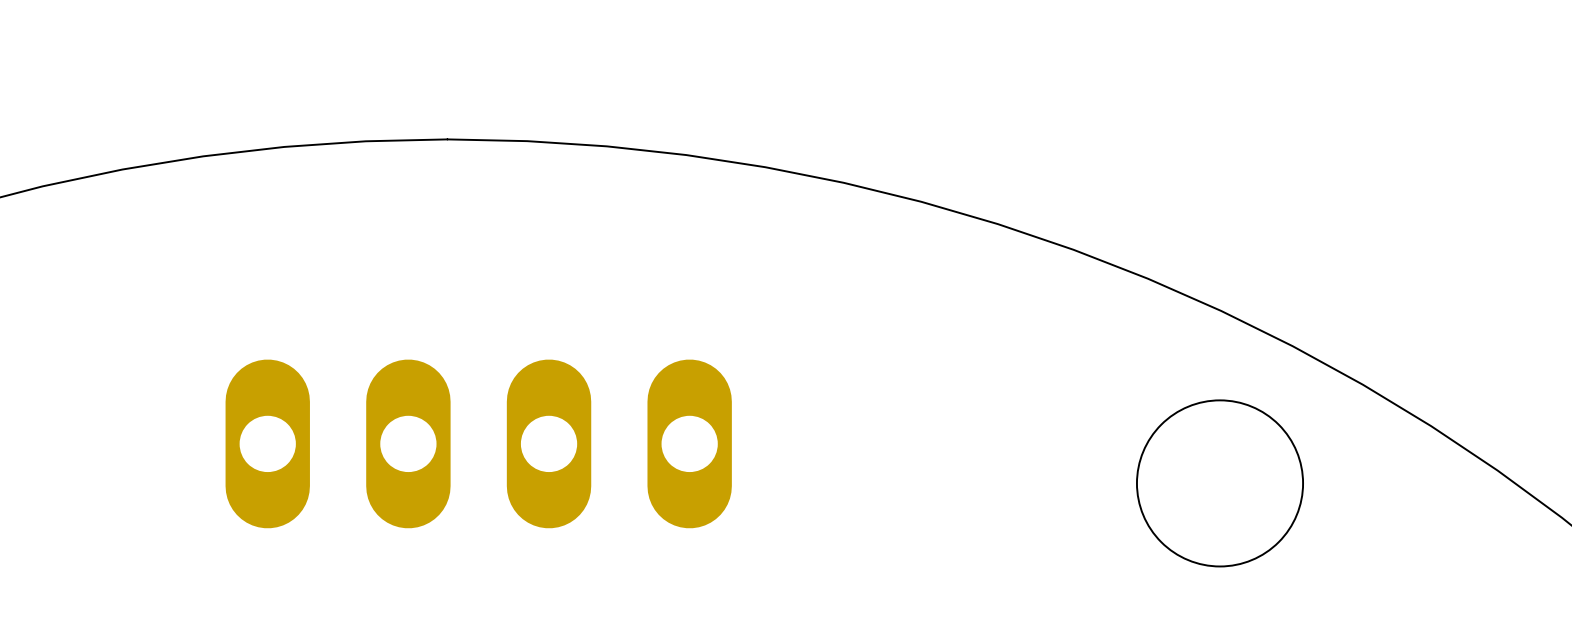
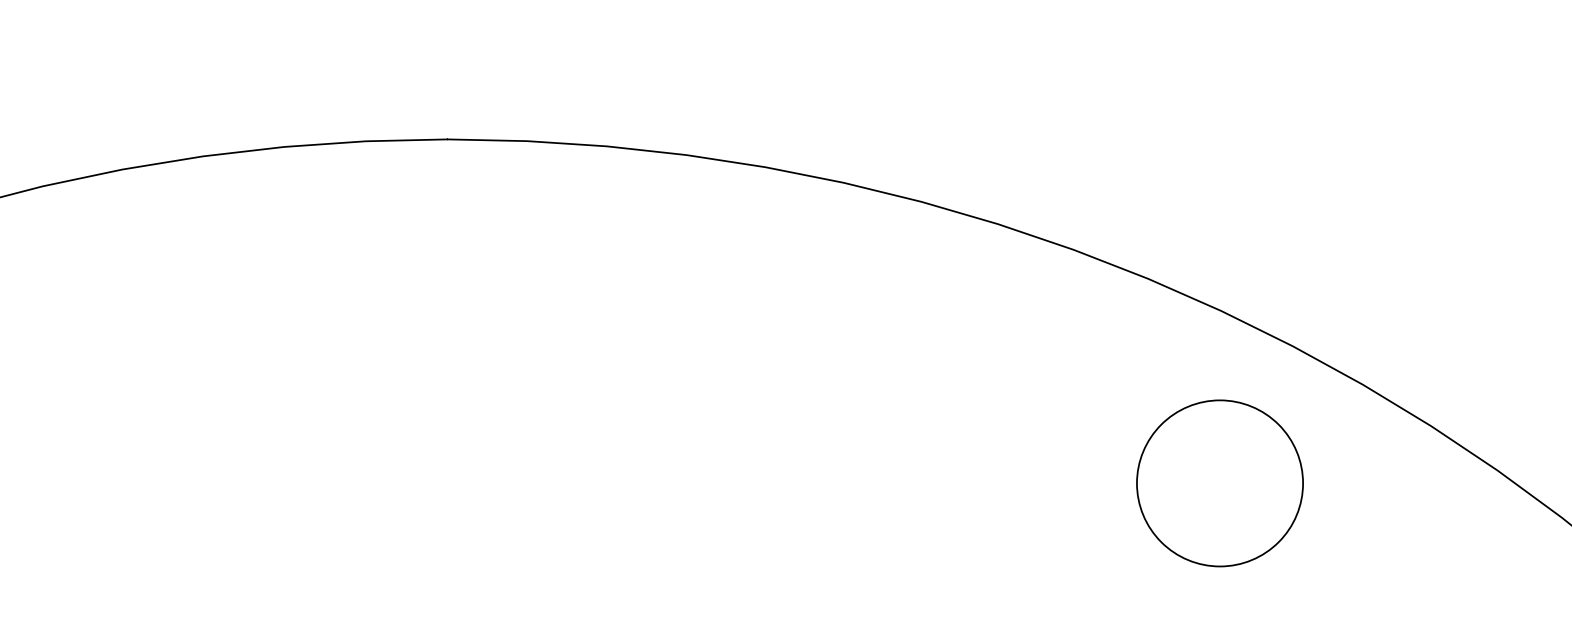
part: (478, 443) -> none

